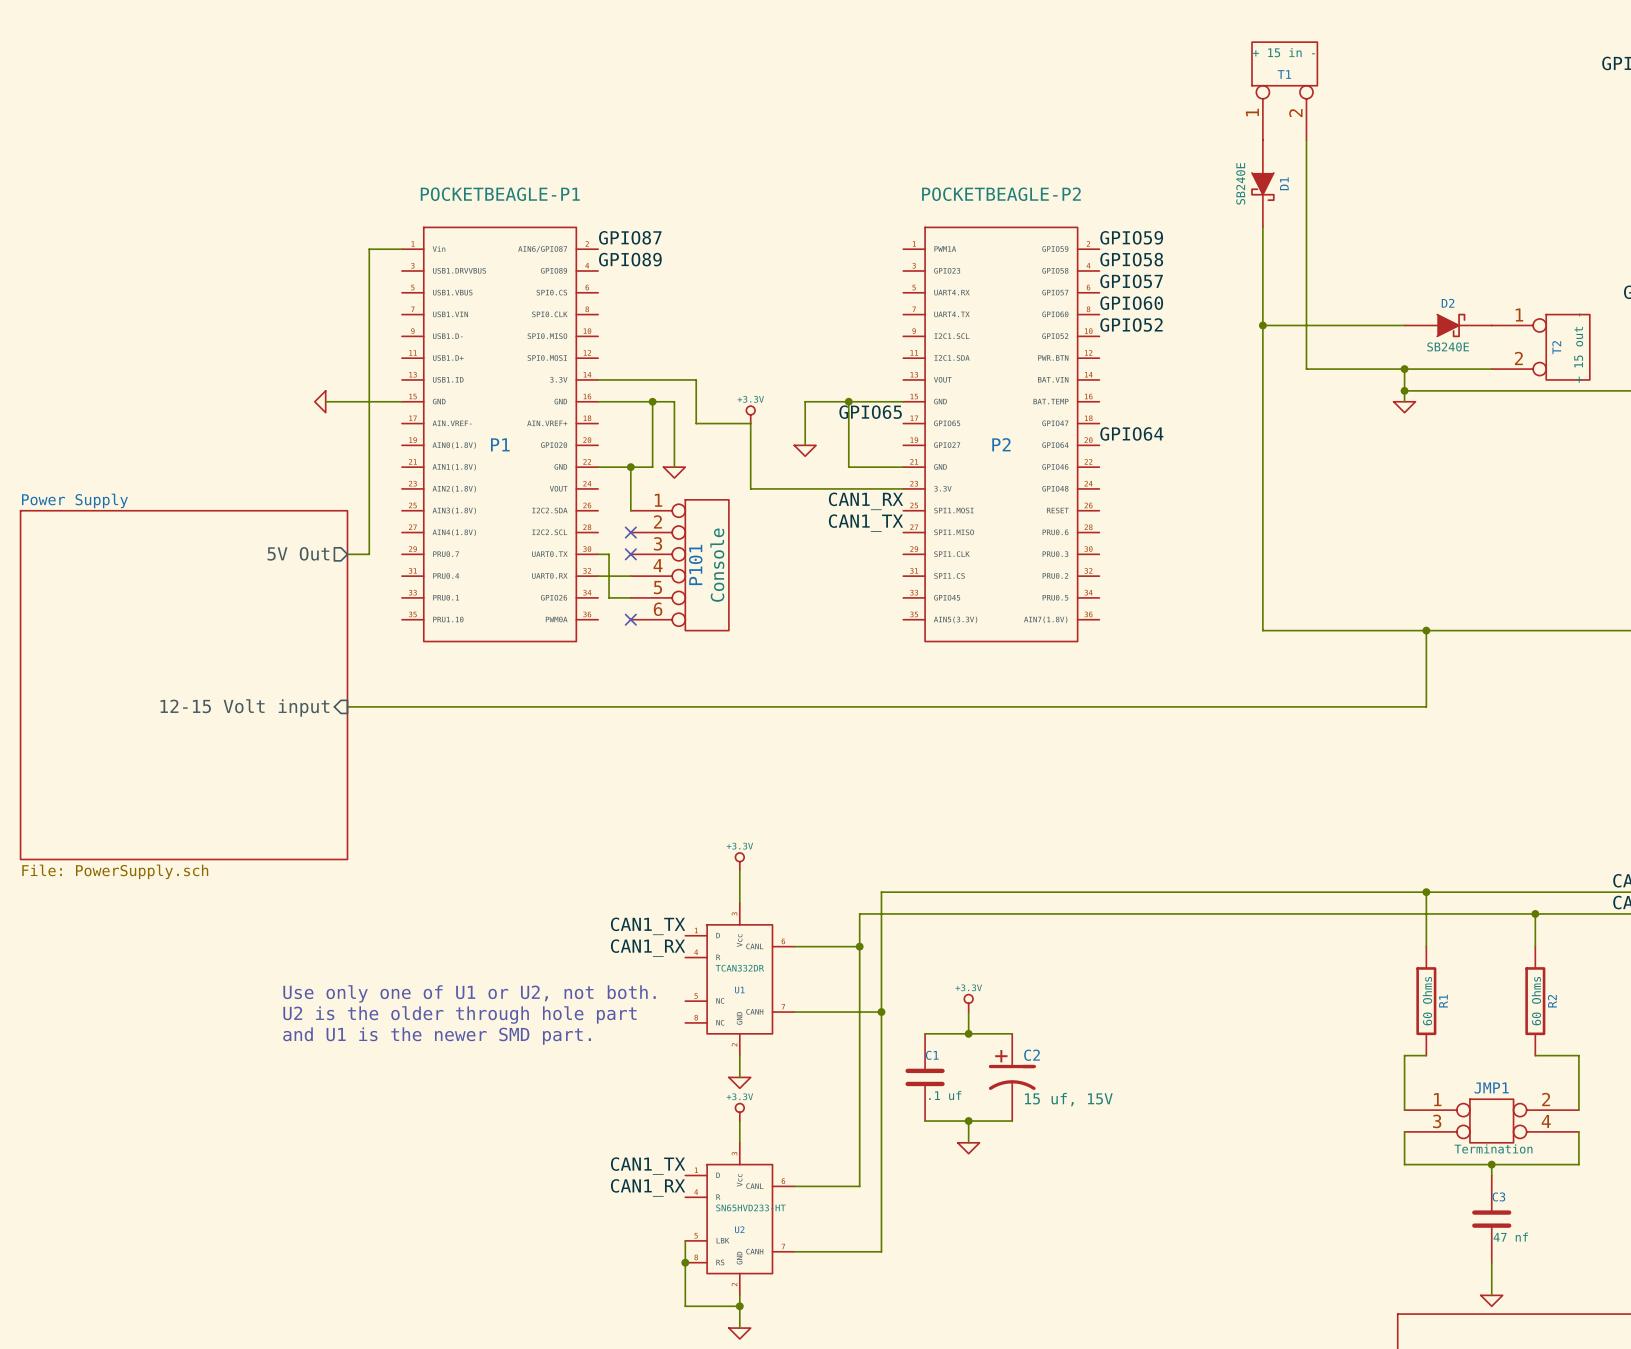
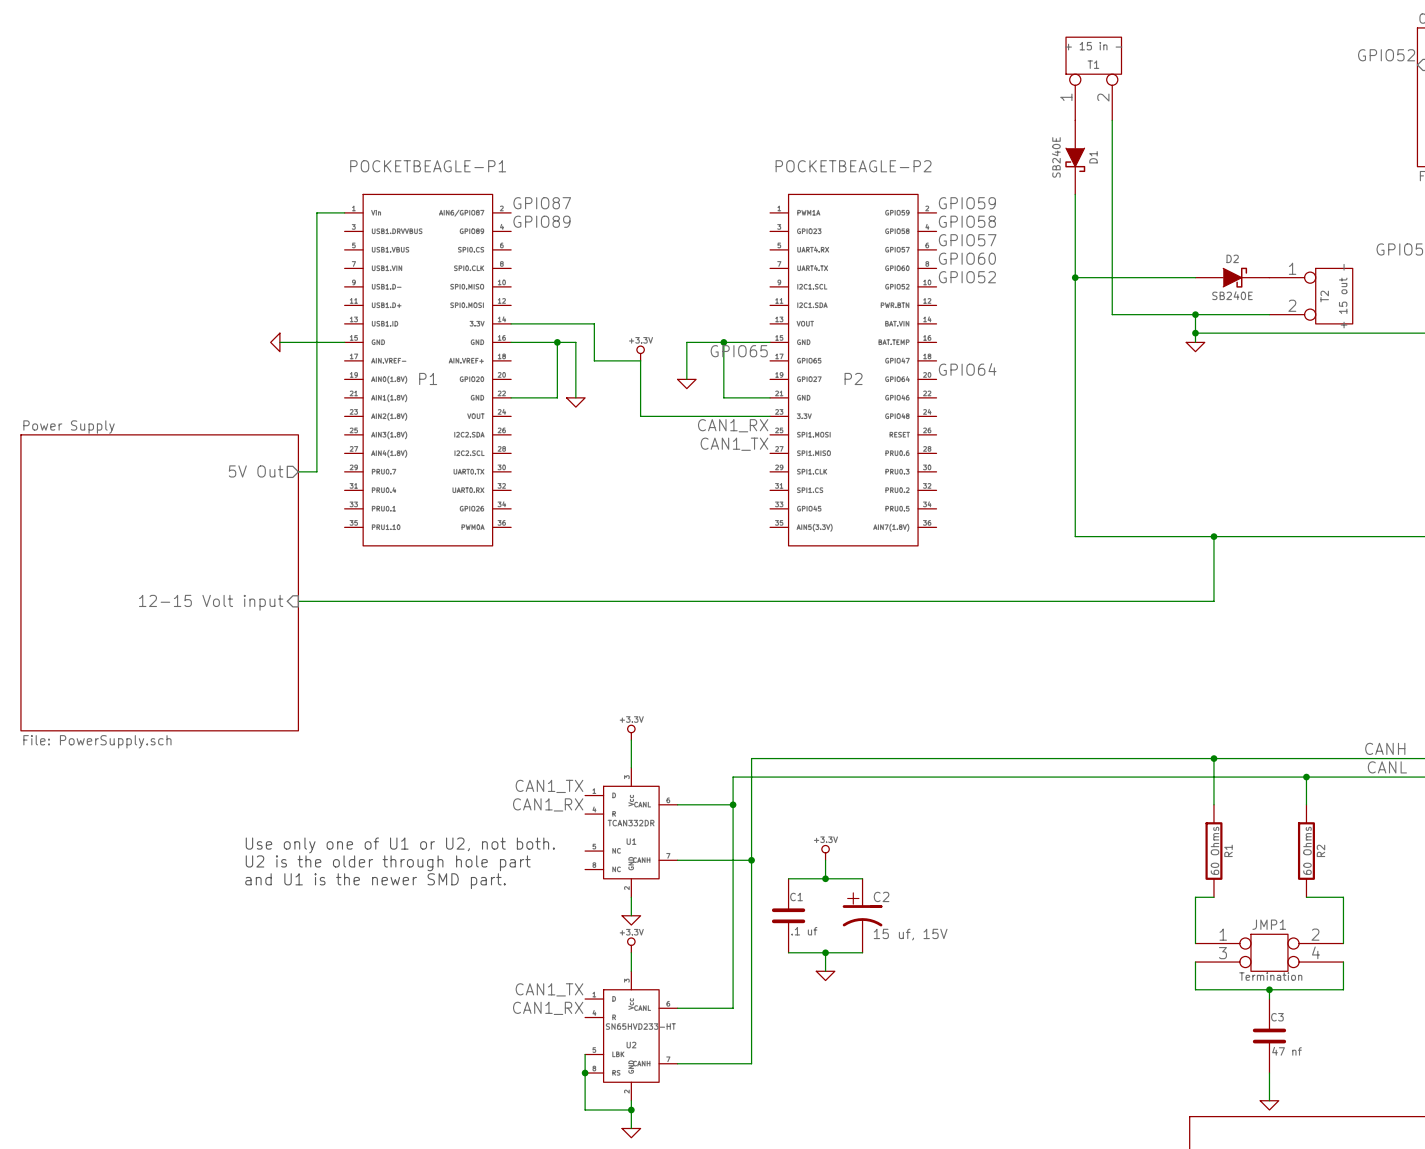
wire: (630, 467) (630, 510) -> none
junction: (630, 467) -> none
no-connect mark: (630, 532) -> none
wire: (598, 554) (609, 554) (609, 597) (630, 597) -> none
no-connect mark: (630, 554) -> none
P101: Console (679, 565) -> none
wire: (598, 576) (630, 576) -> none
no-connect mark: (630, 619) -> none

